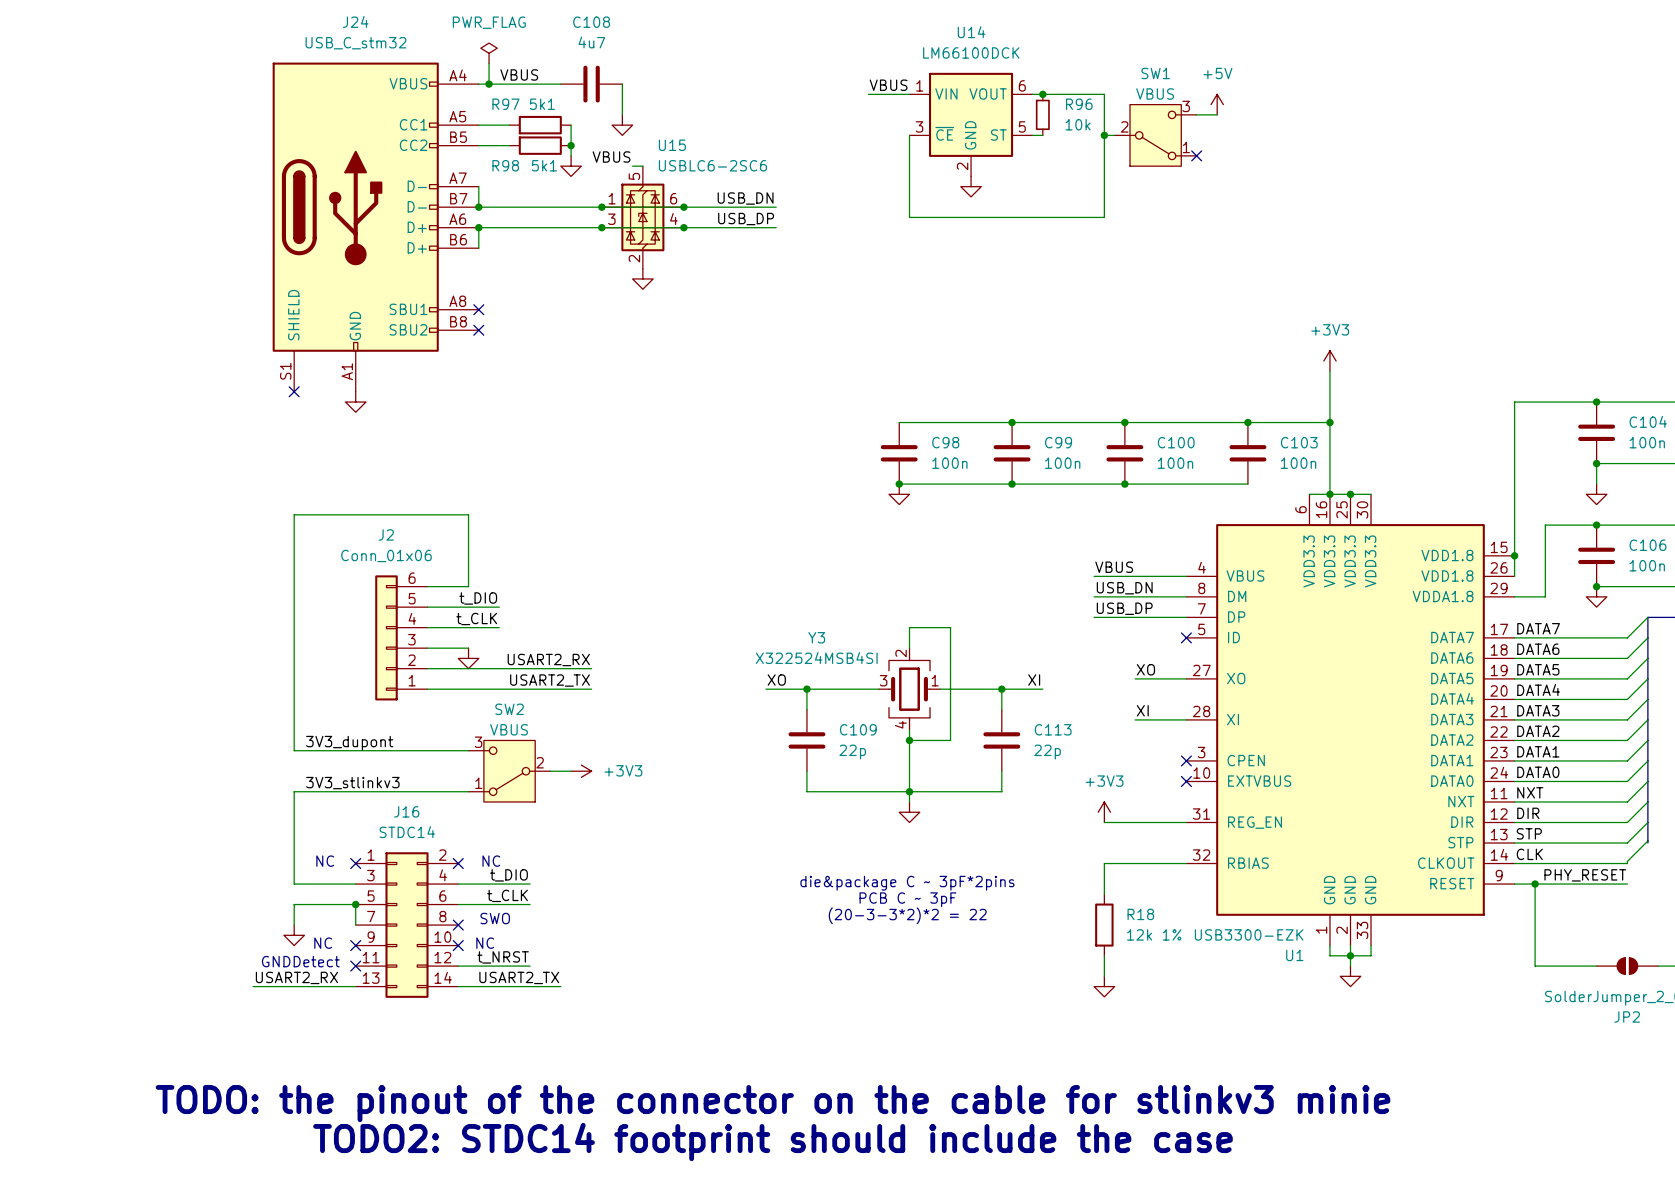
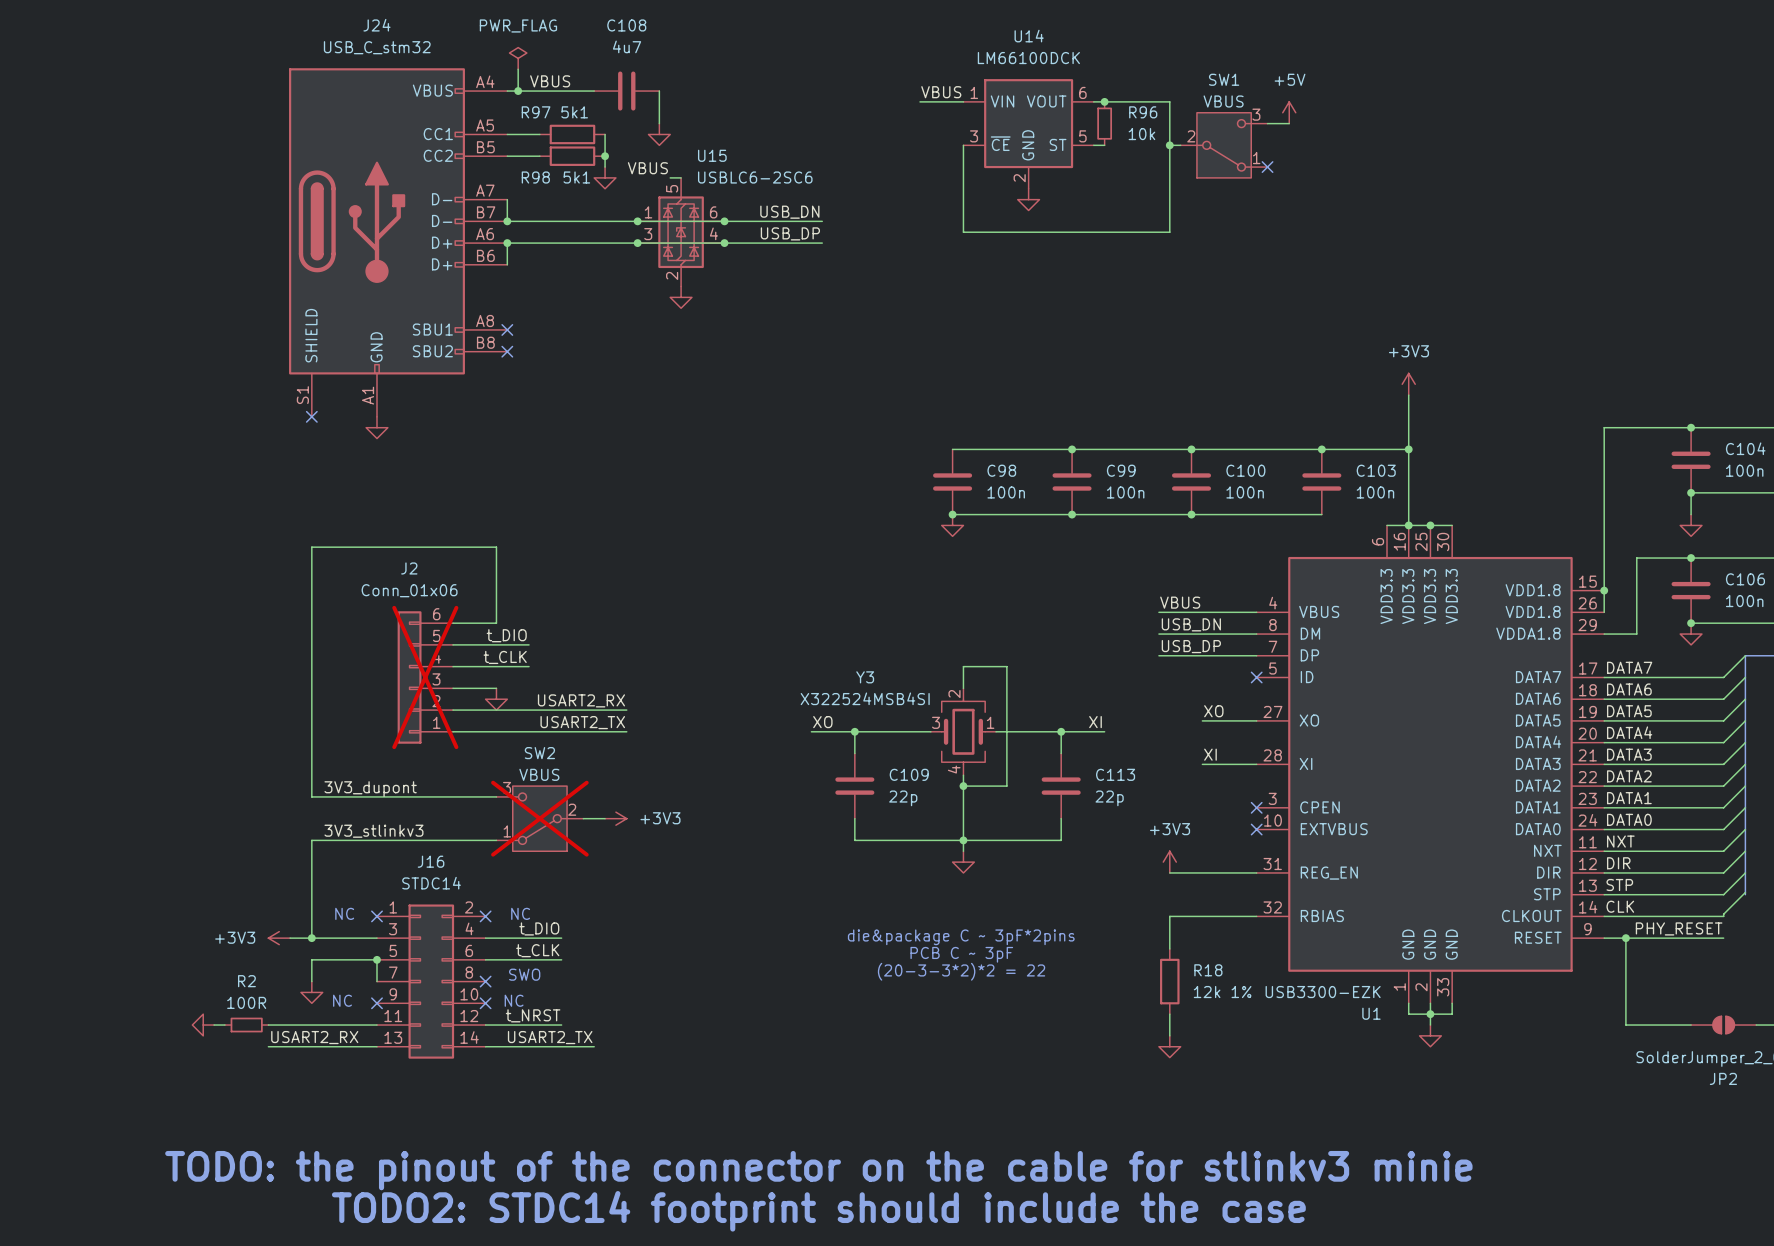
J2 do-not-place cross: none -> (425, 677)
SW2 do-not-place cross: none -> (539, 818)
power symbol: none -> +3V3 (279, 938)
wire: none -> (290, 938) (311, 938)
junction: none -> (311, 938)
text: GNDDetect (300, 961) -> none
power symbol: none -> (203, 1025)
wire: none -> (214, 1025) (224, 1025)
R2: none -> 100R (246, 1025)
wire: none -> (268, 1025) (376, 1025)
no-connect mark: (355, 966) -> none

